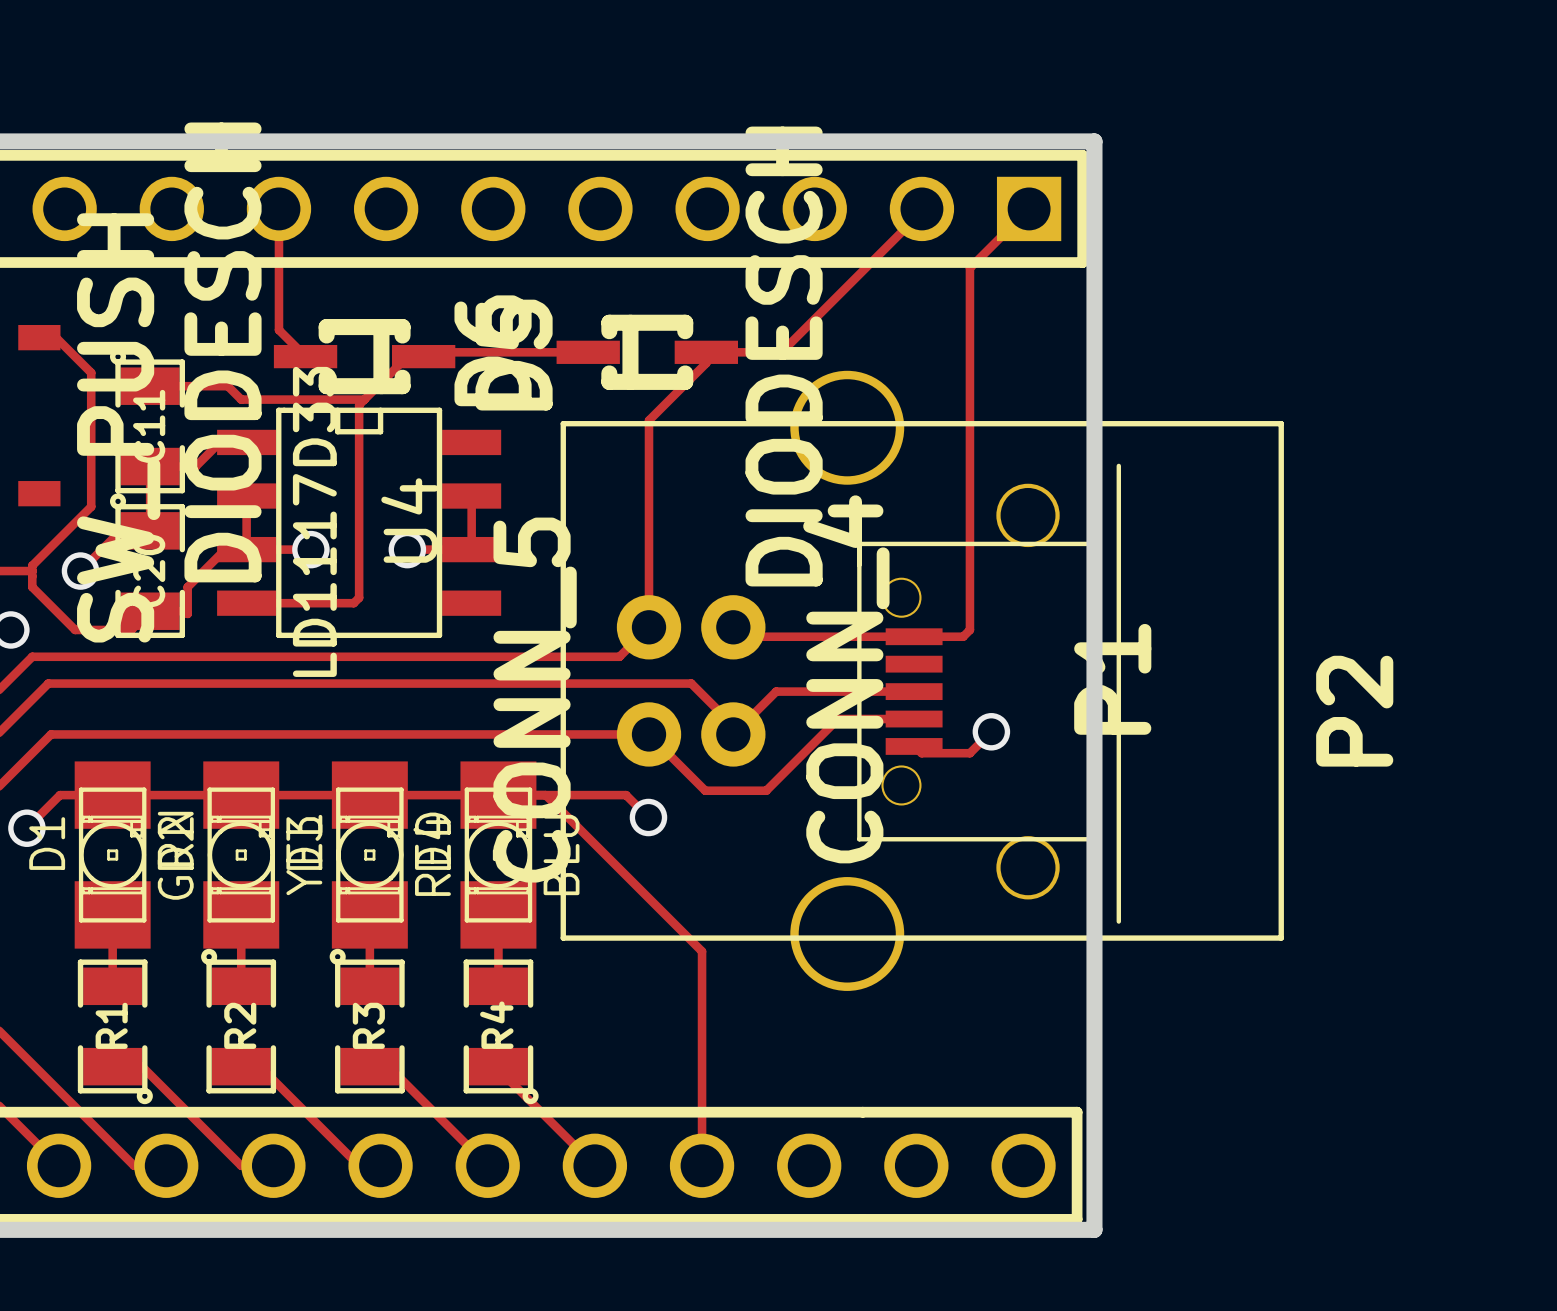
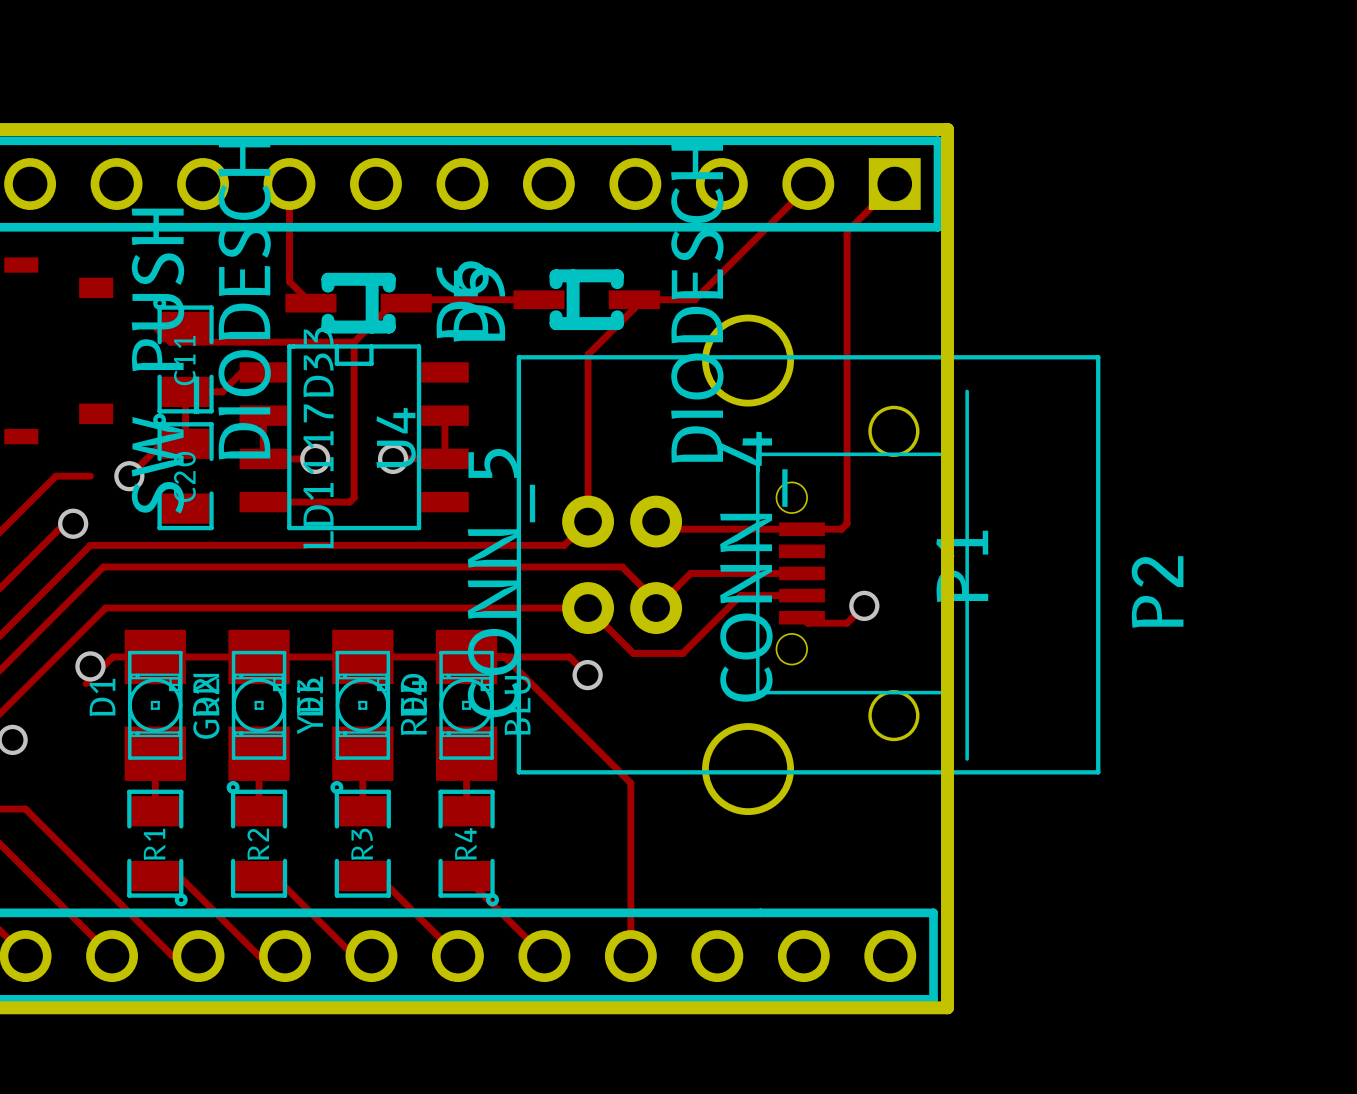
track: (39, 337) (56, 337) (91, 372) (91, 506) (32, 565) (32, 587) (75, 629) (131, 629) (150, 611) (185, 611) (187, 613) (187, 587) (225, 549) -> none
track: none -> (155, 327) (170, 342) (354, 342)
track: (150, 386) (227, 386) (241, 399) (364, 399) -> none
via position: (26, 828) -> (90, 666)

